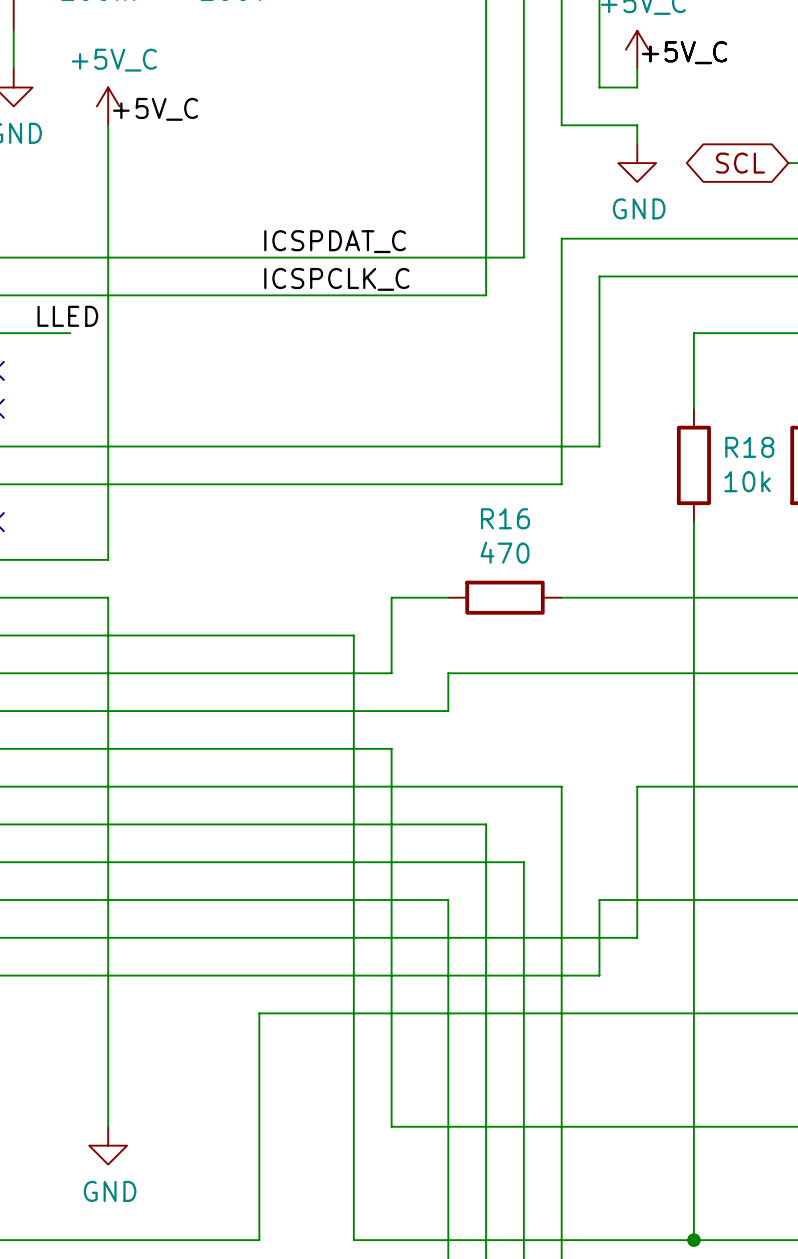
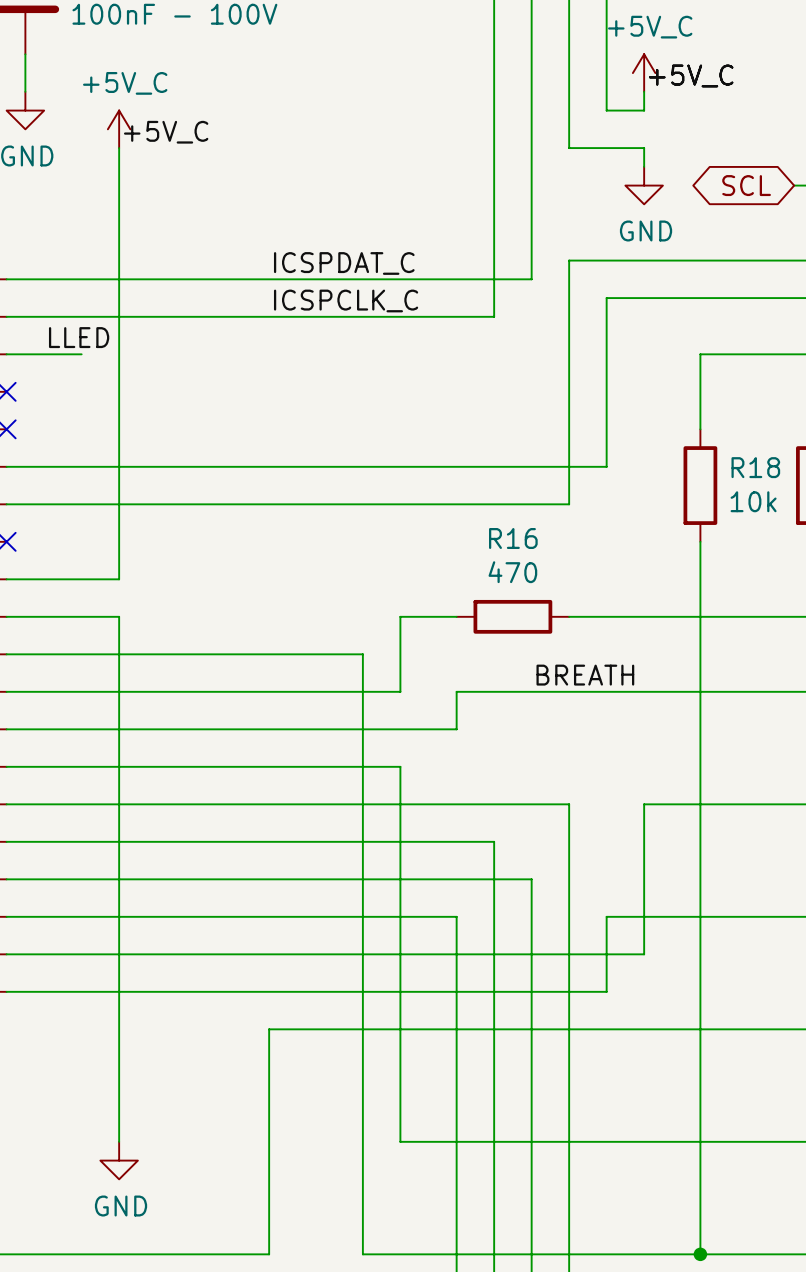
label: none -> BREATH (585, 675)

